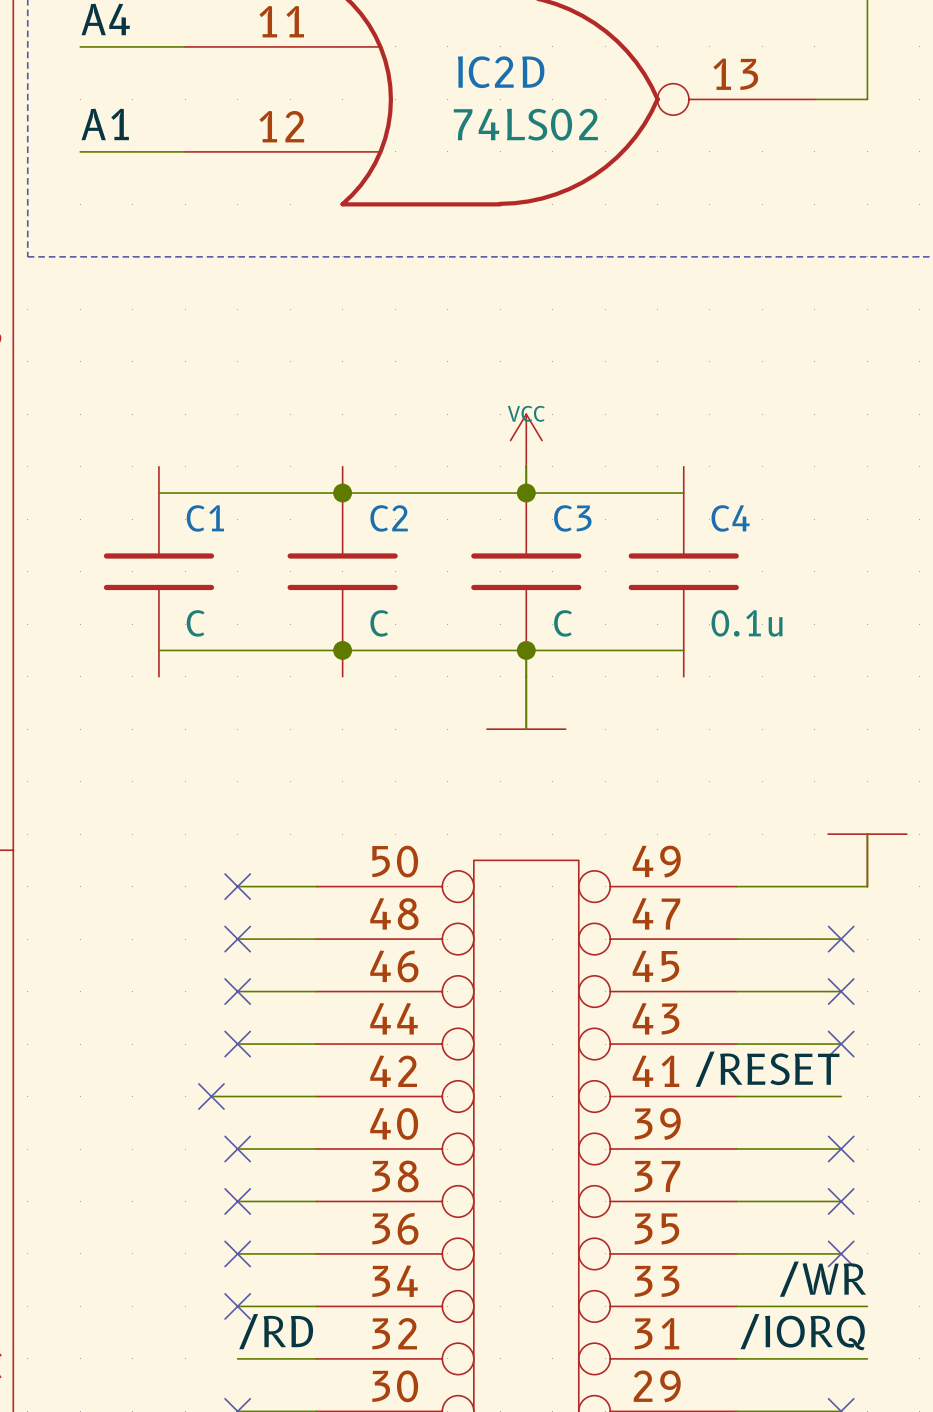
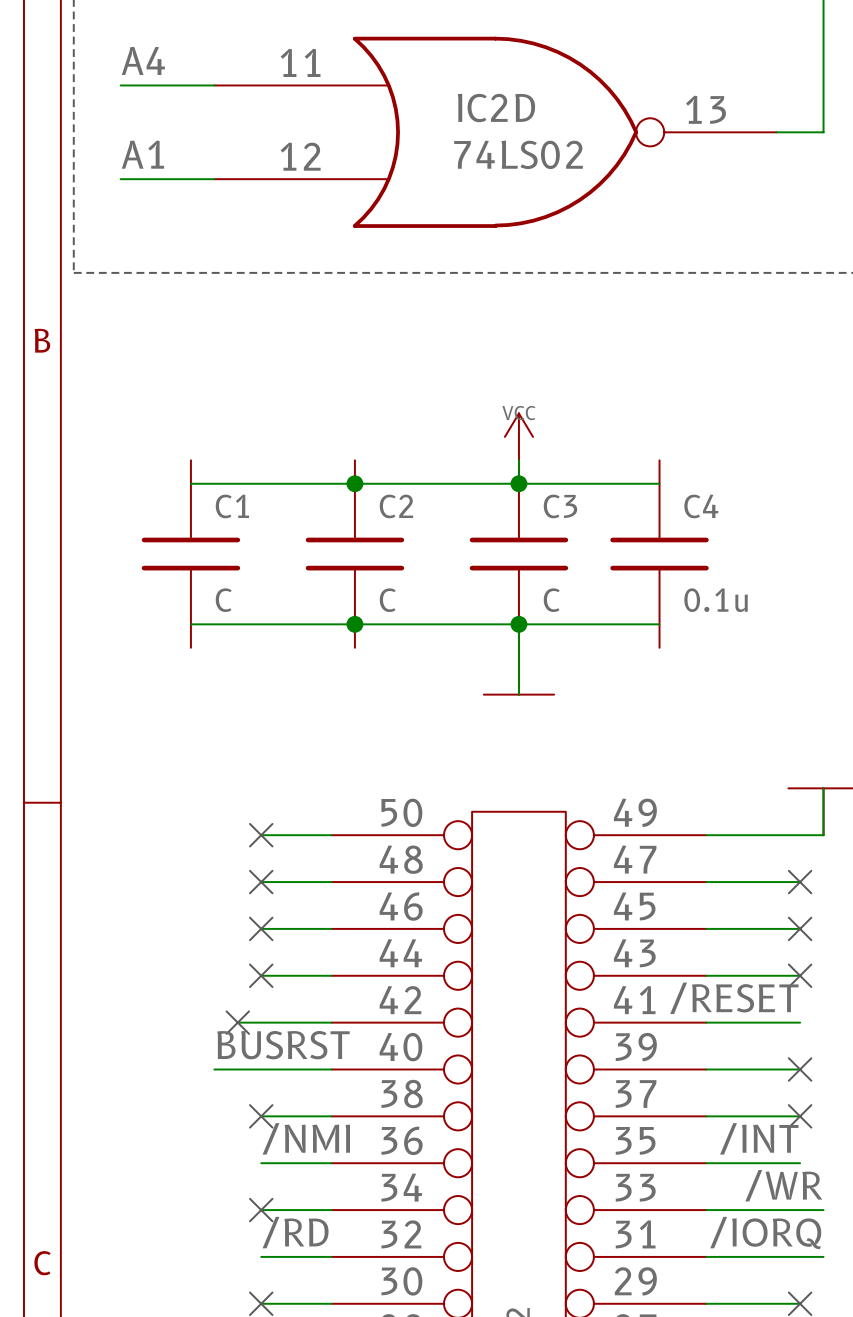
label: none -> BUSRST (283, 1045)
wire: none -> (214, 1069) (261, 1069)
no-connect mark: (237, 1149) -> none
label: none -> /NMI (306, 1138)
label: none -> /INT (759, 1138)
no-connect mark: (237, 1253) -> none
no-connect mark: (841, 1253) -> none

